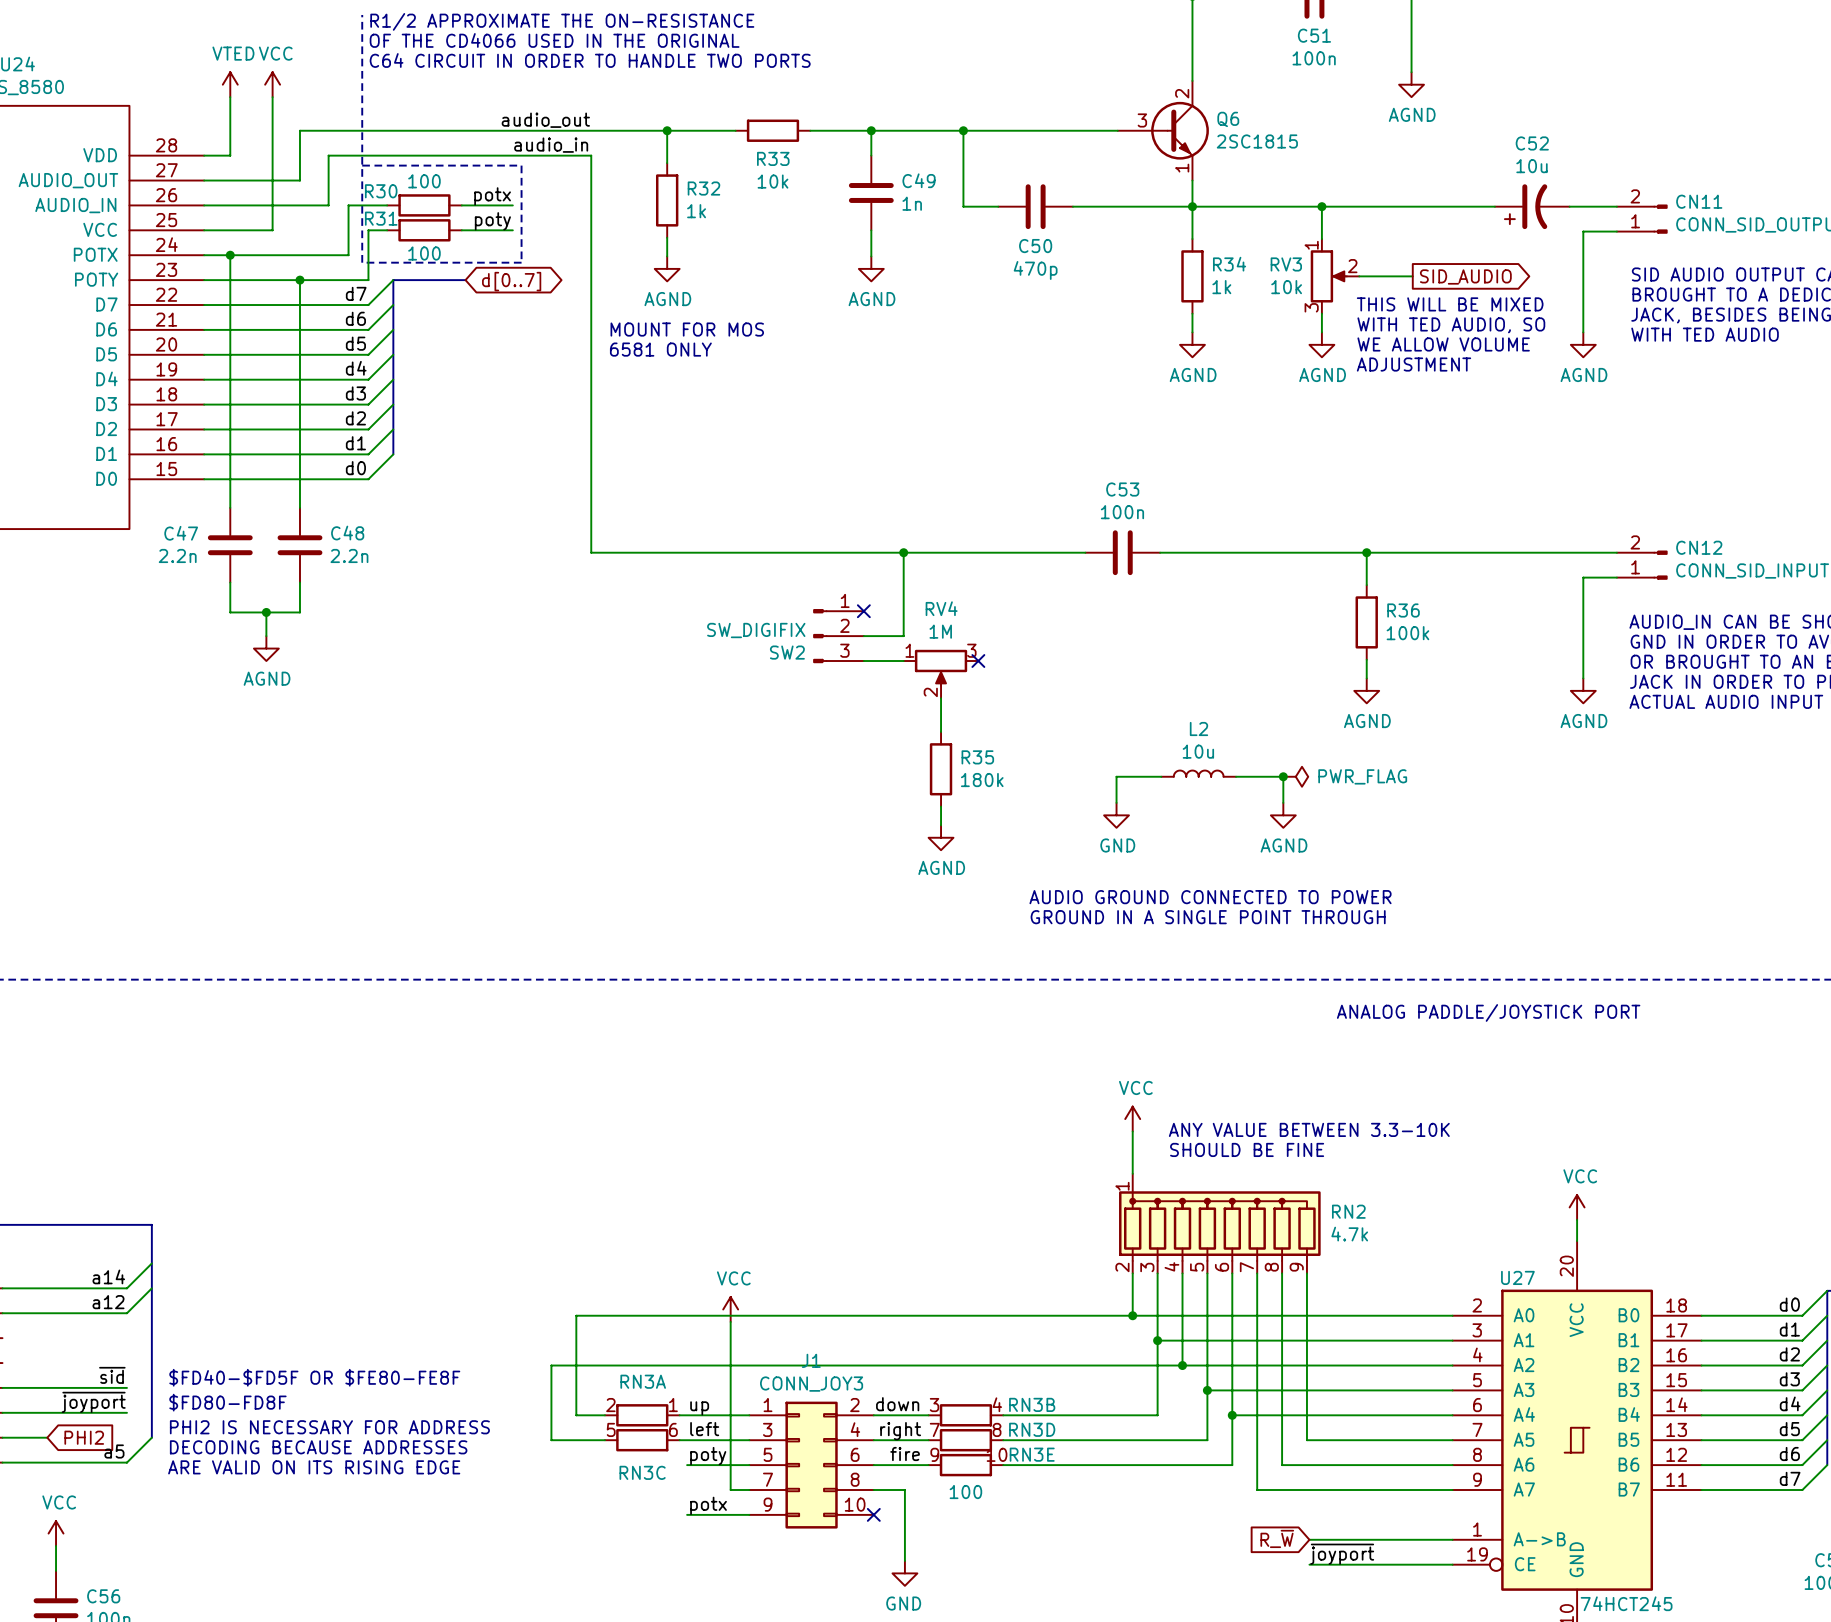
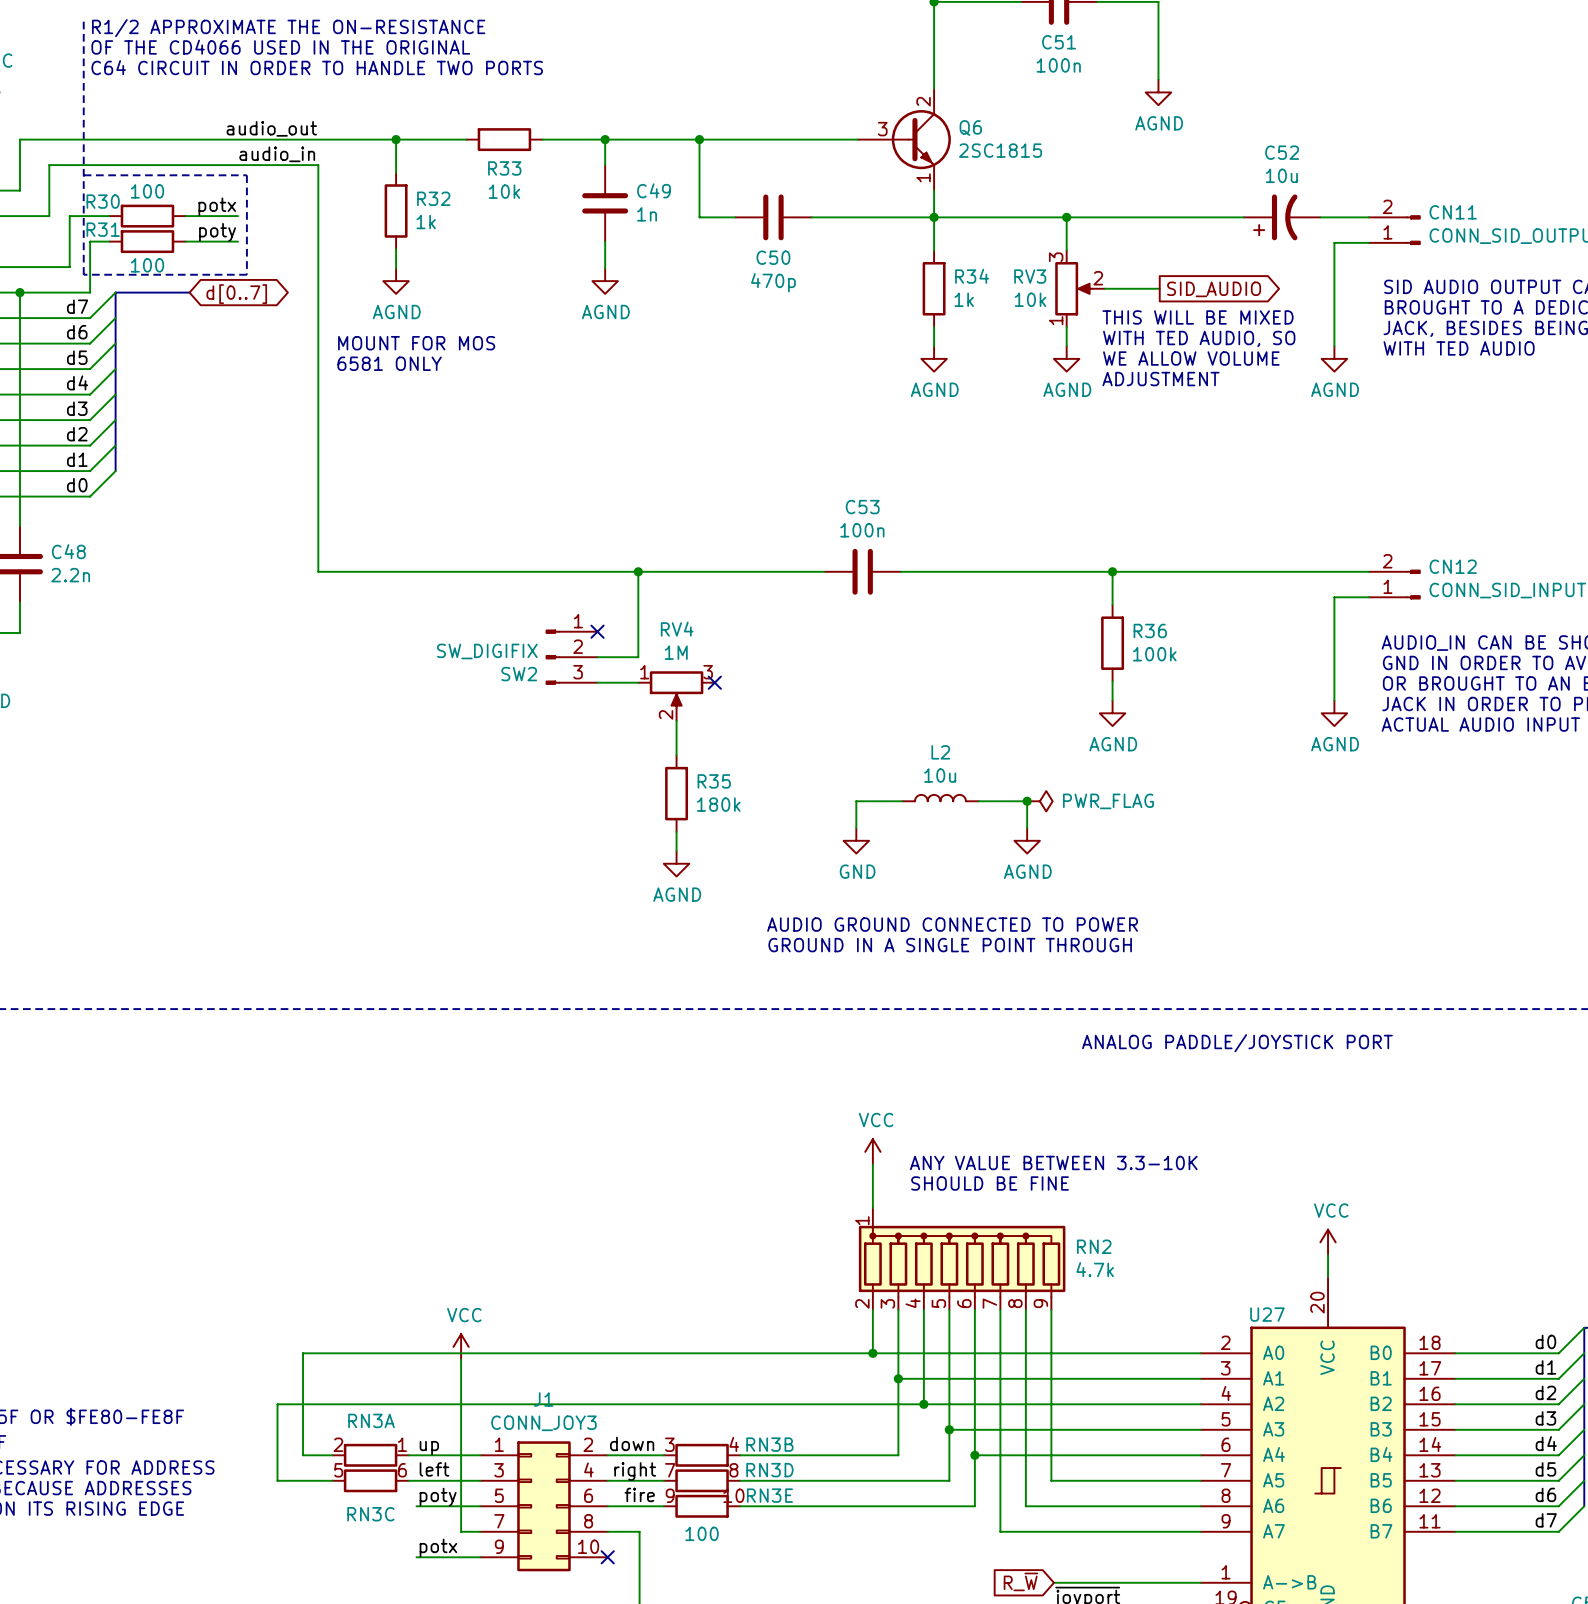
RV3 flip: as is (1328, 276) -> up-down (1073, 288)

